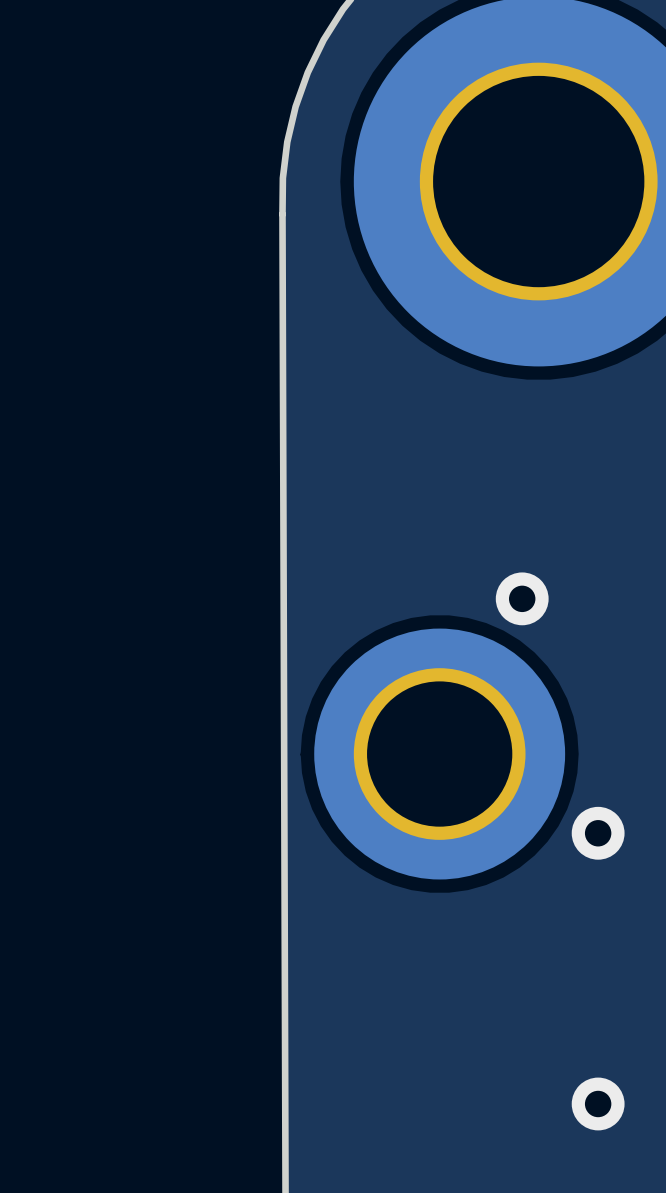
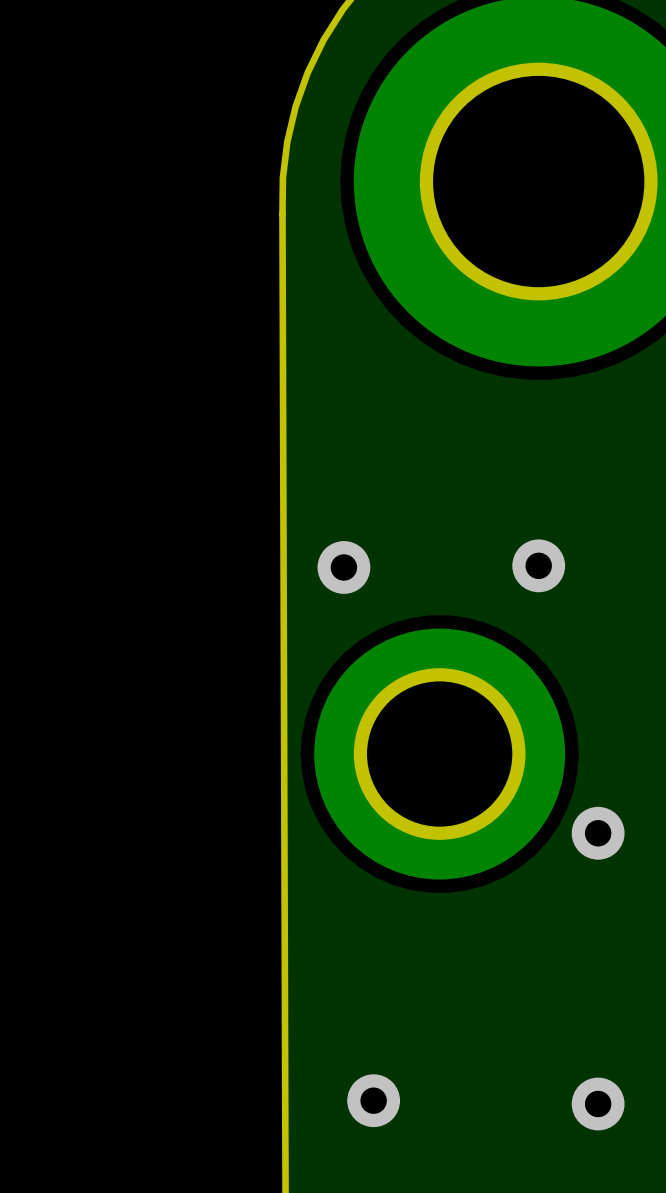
via: none -> (343, 567)
via position: (522, 598) -> (538, 565)
via: none -> (373, 1100)

